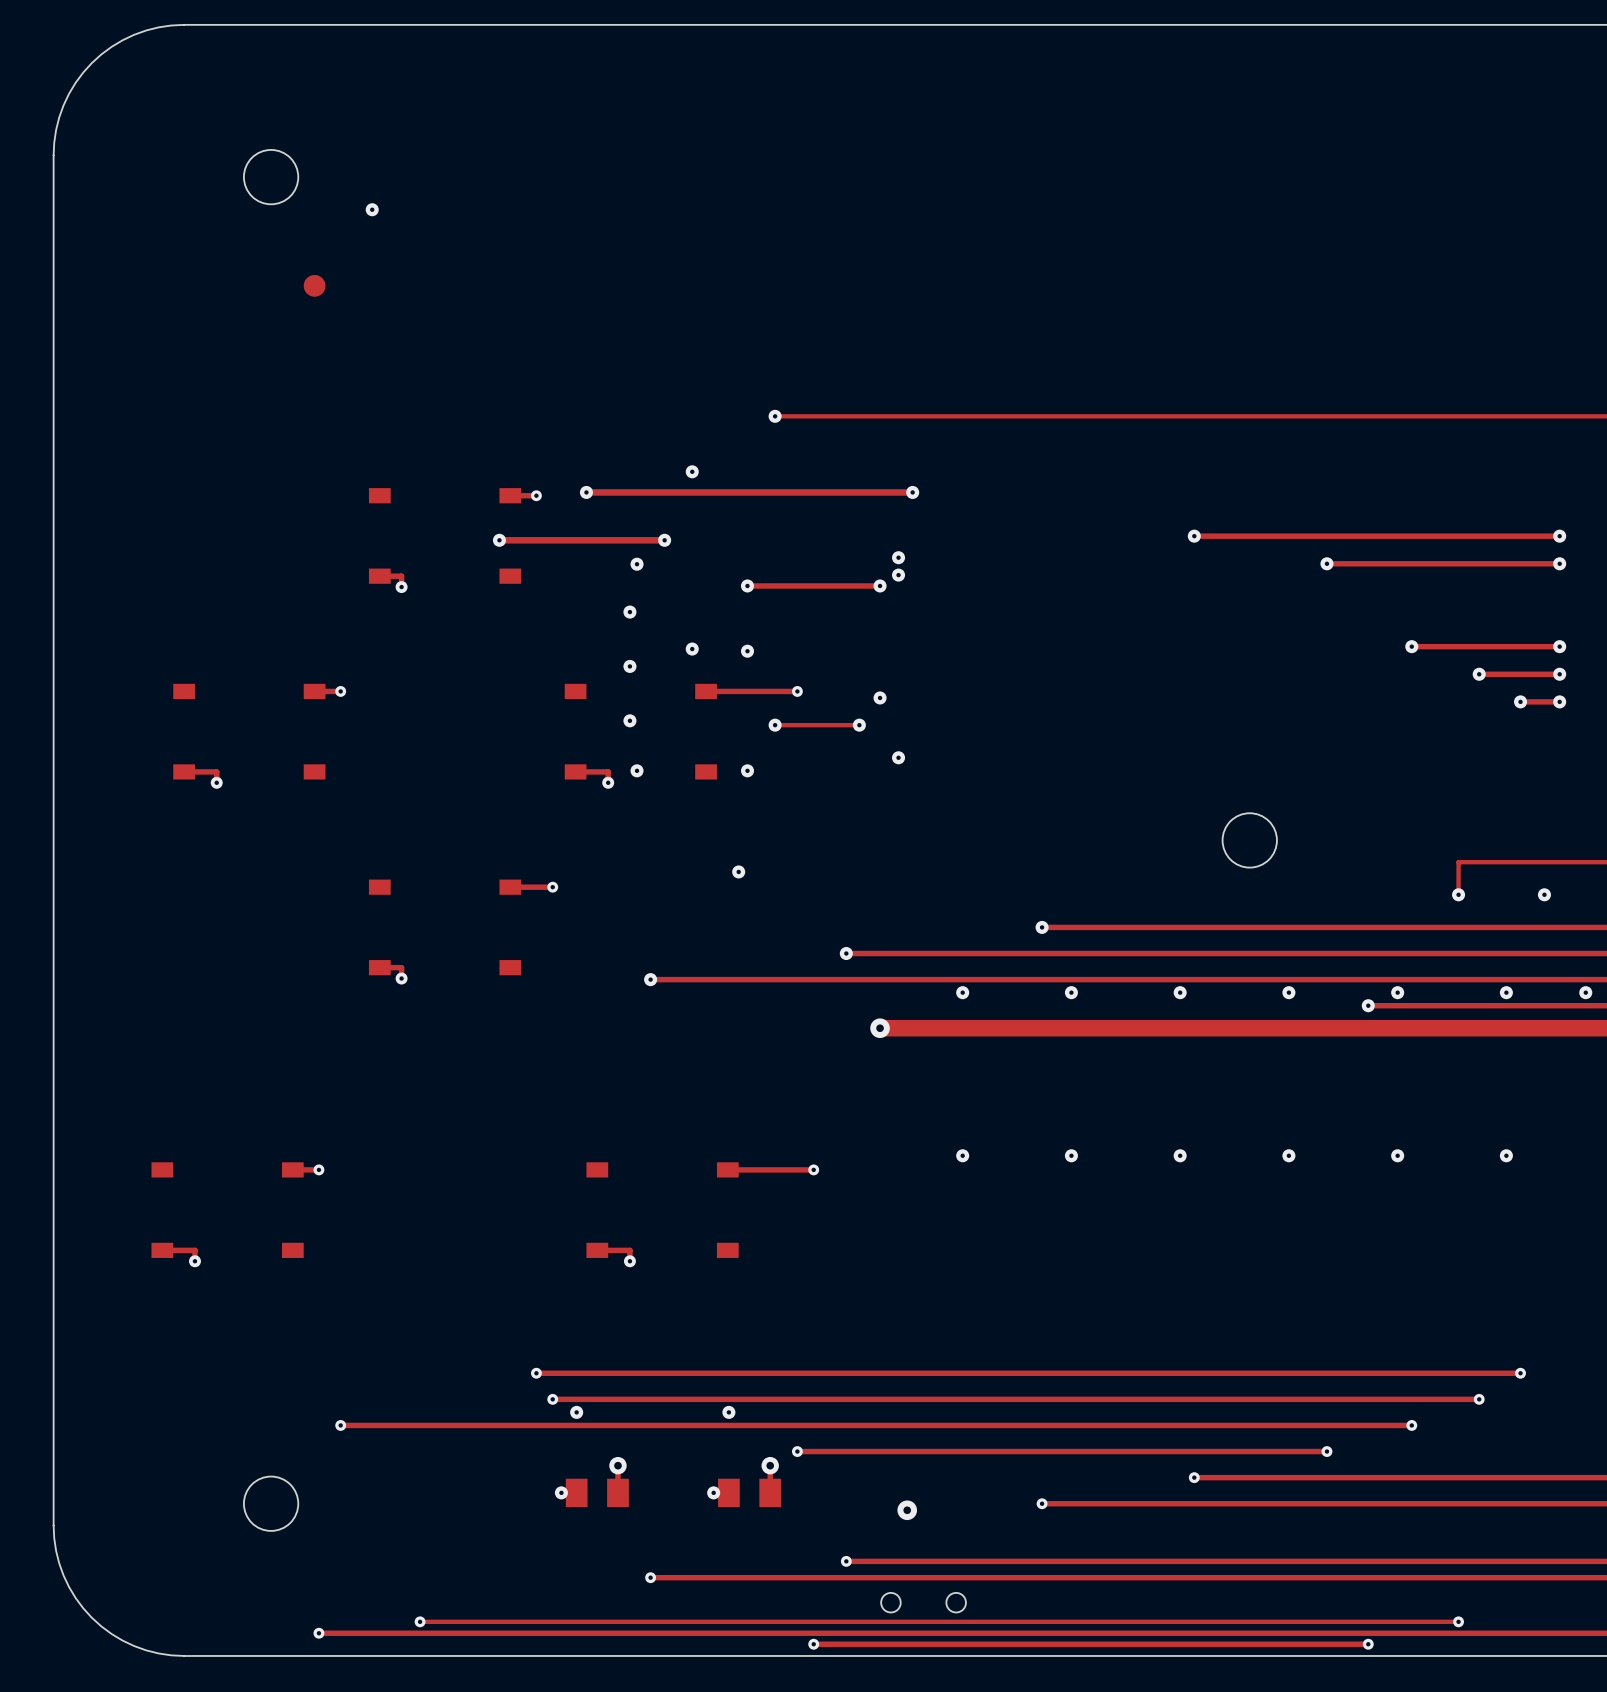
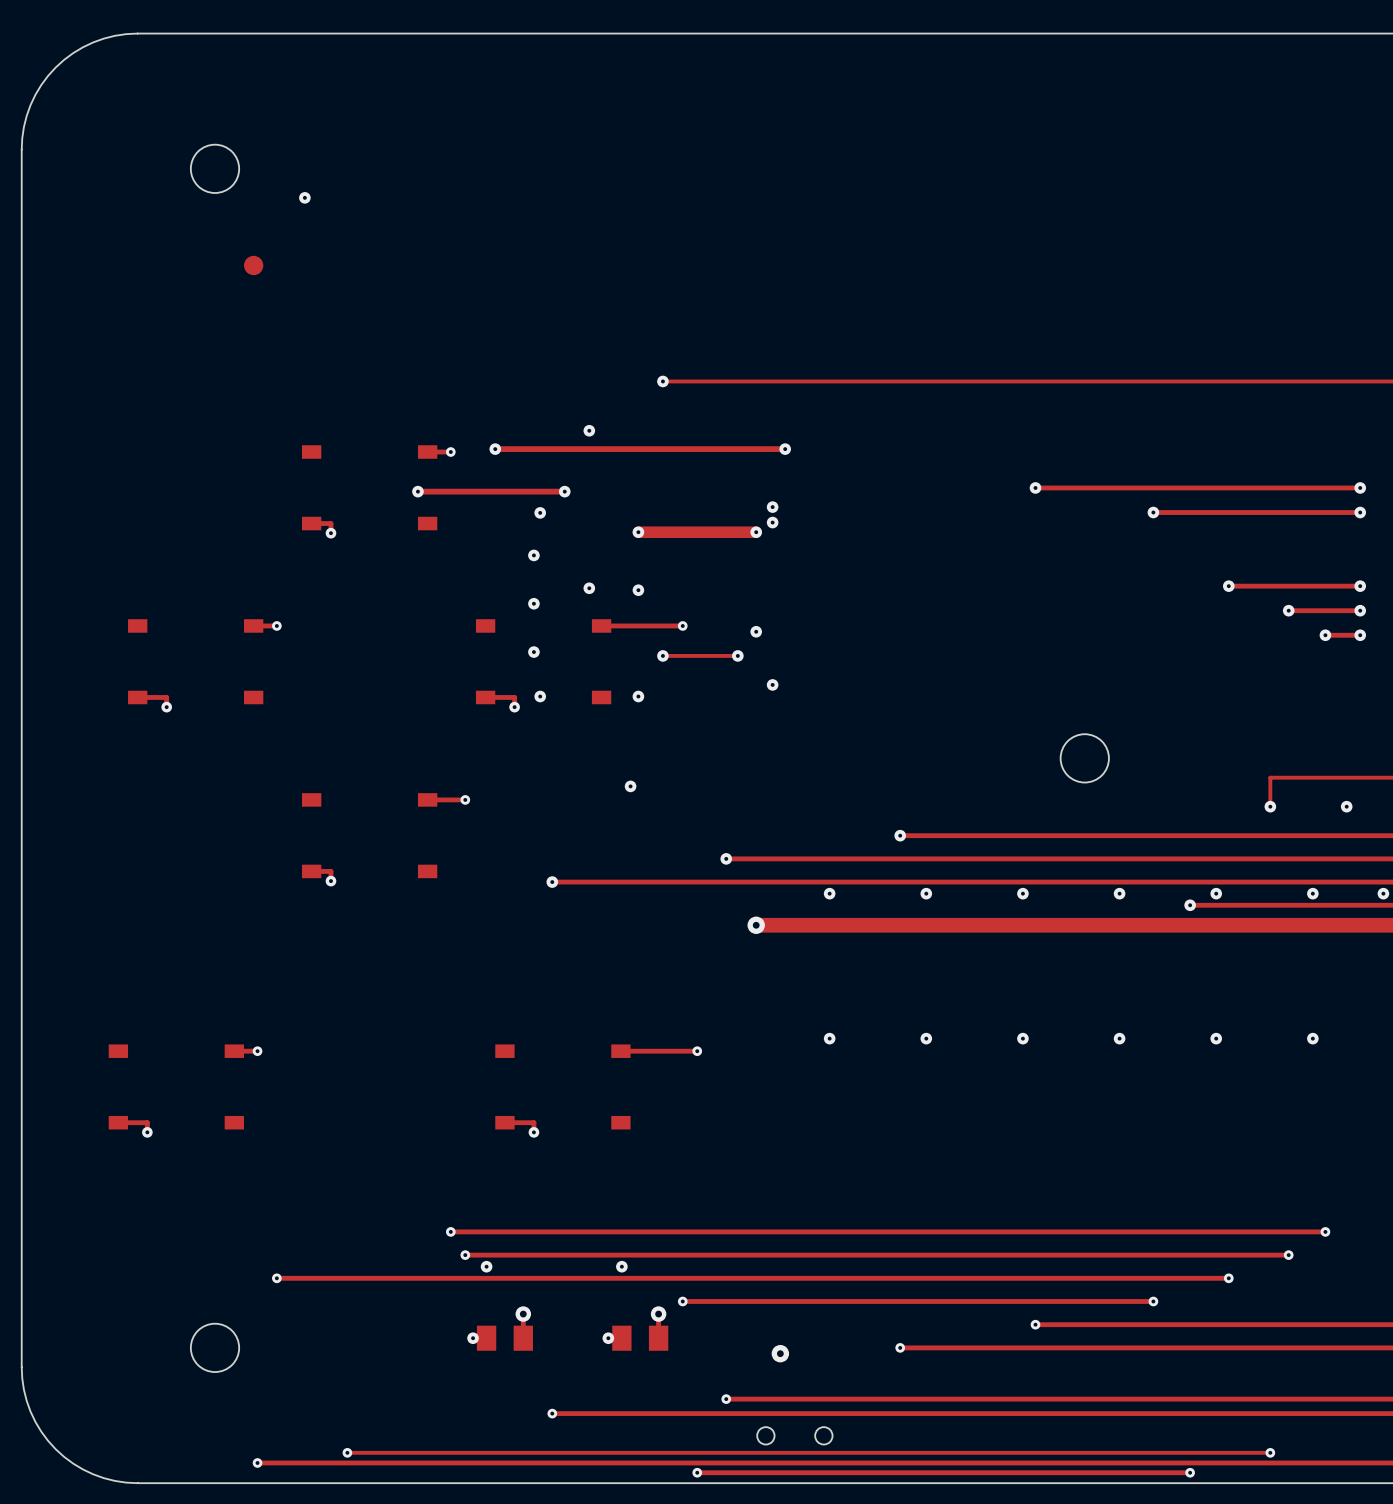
track width: thin (747, 585) (880, 585) -> thick (638, 532) (756, 532)

